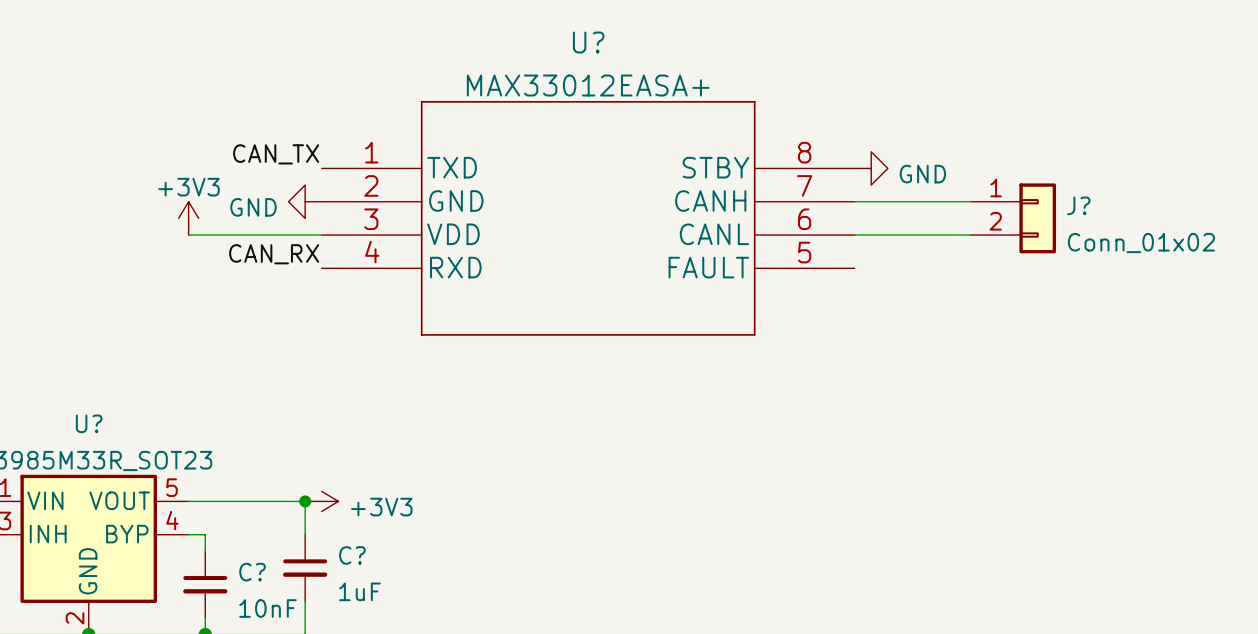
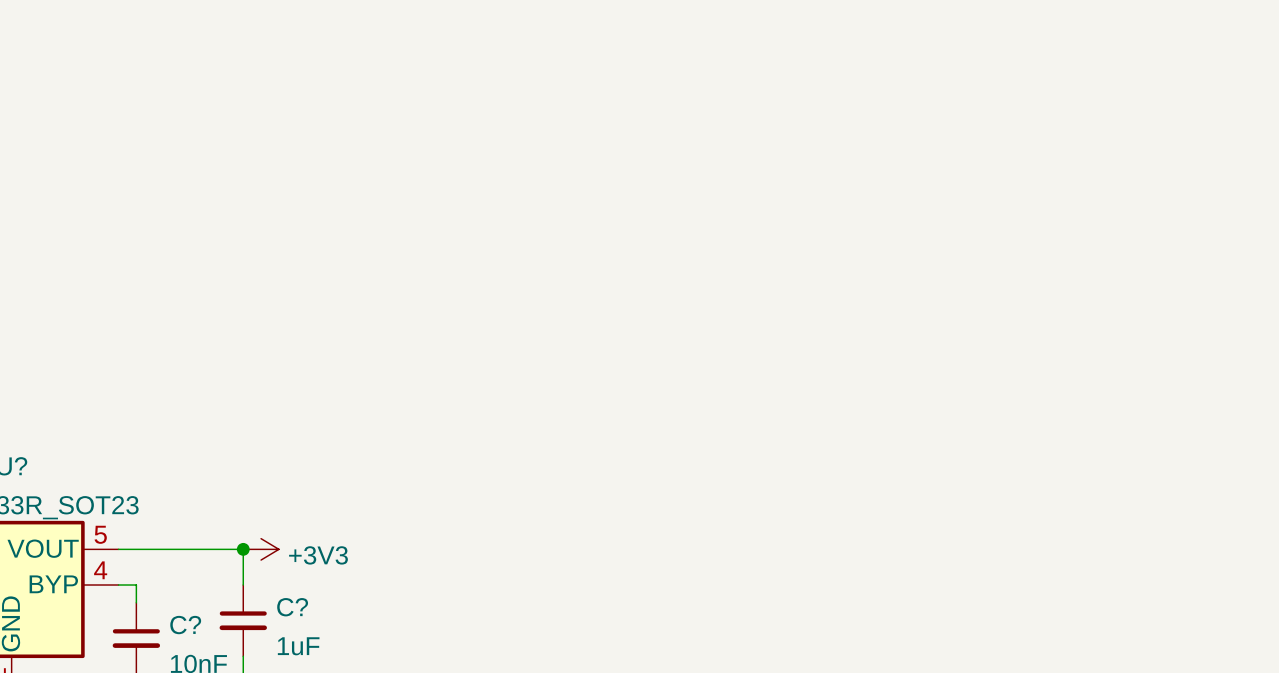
label: CAN_TX (276, 154) -> none
power symbol: GND (871, 168) -> none
power symbol: GND (305, 201) -> none
wire: (854, 201) (971, 201) -> none
power symbol: +3V3 (188, 218) -> none
U?: MAX33012EASA+ (588, 218) -> none
J?: Conn_01x02 (1013, 218) -> none
wire: (188, 235) (321, 235) -> none
wire: (854, 235) (971, 235) -> none
label: CAN_RX (274, 254) -> none

